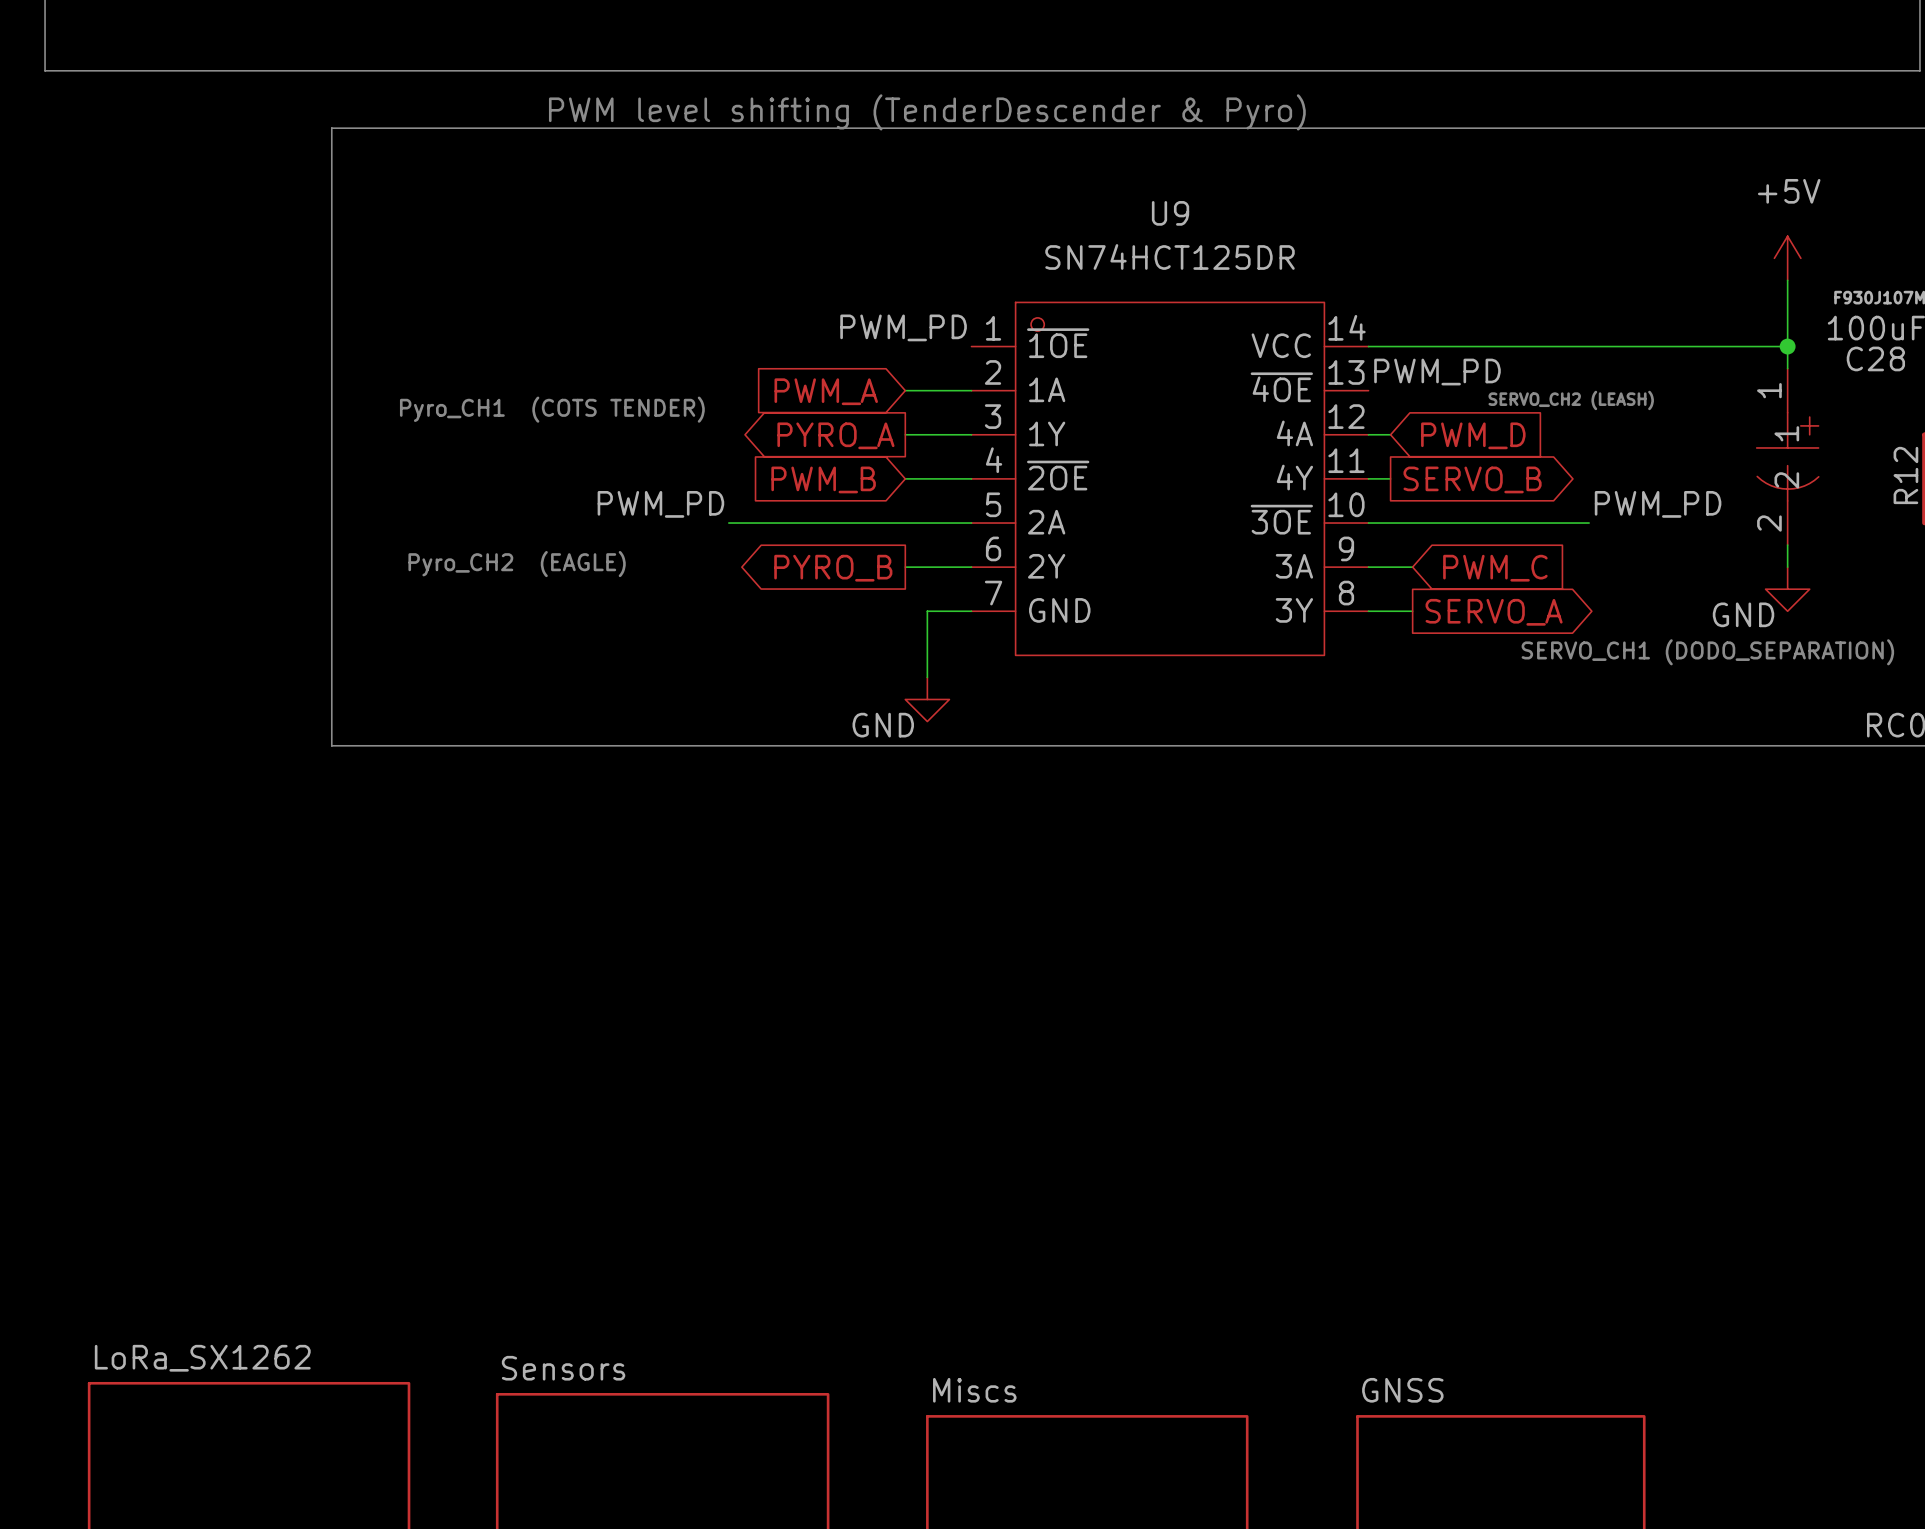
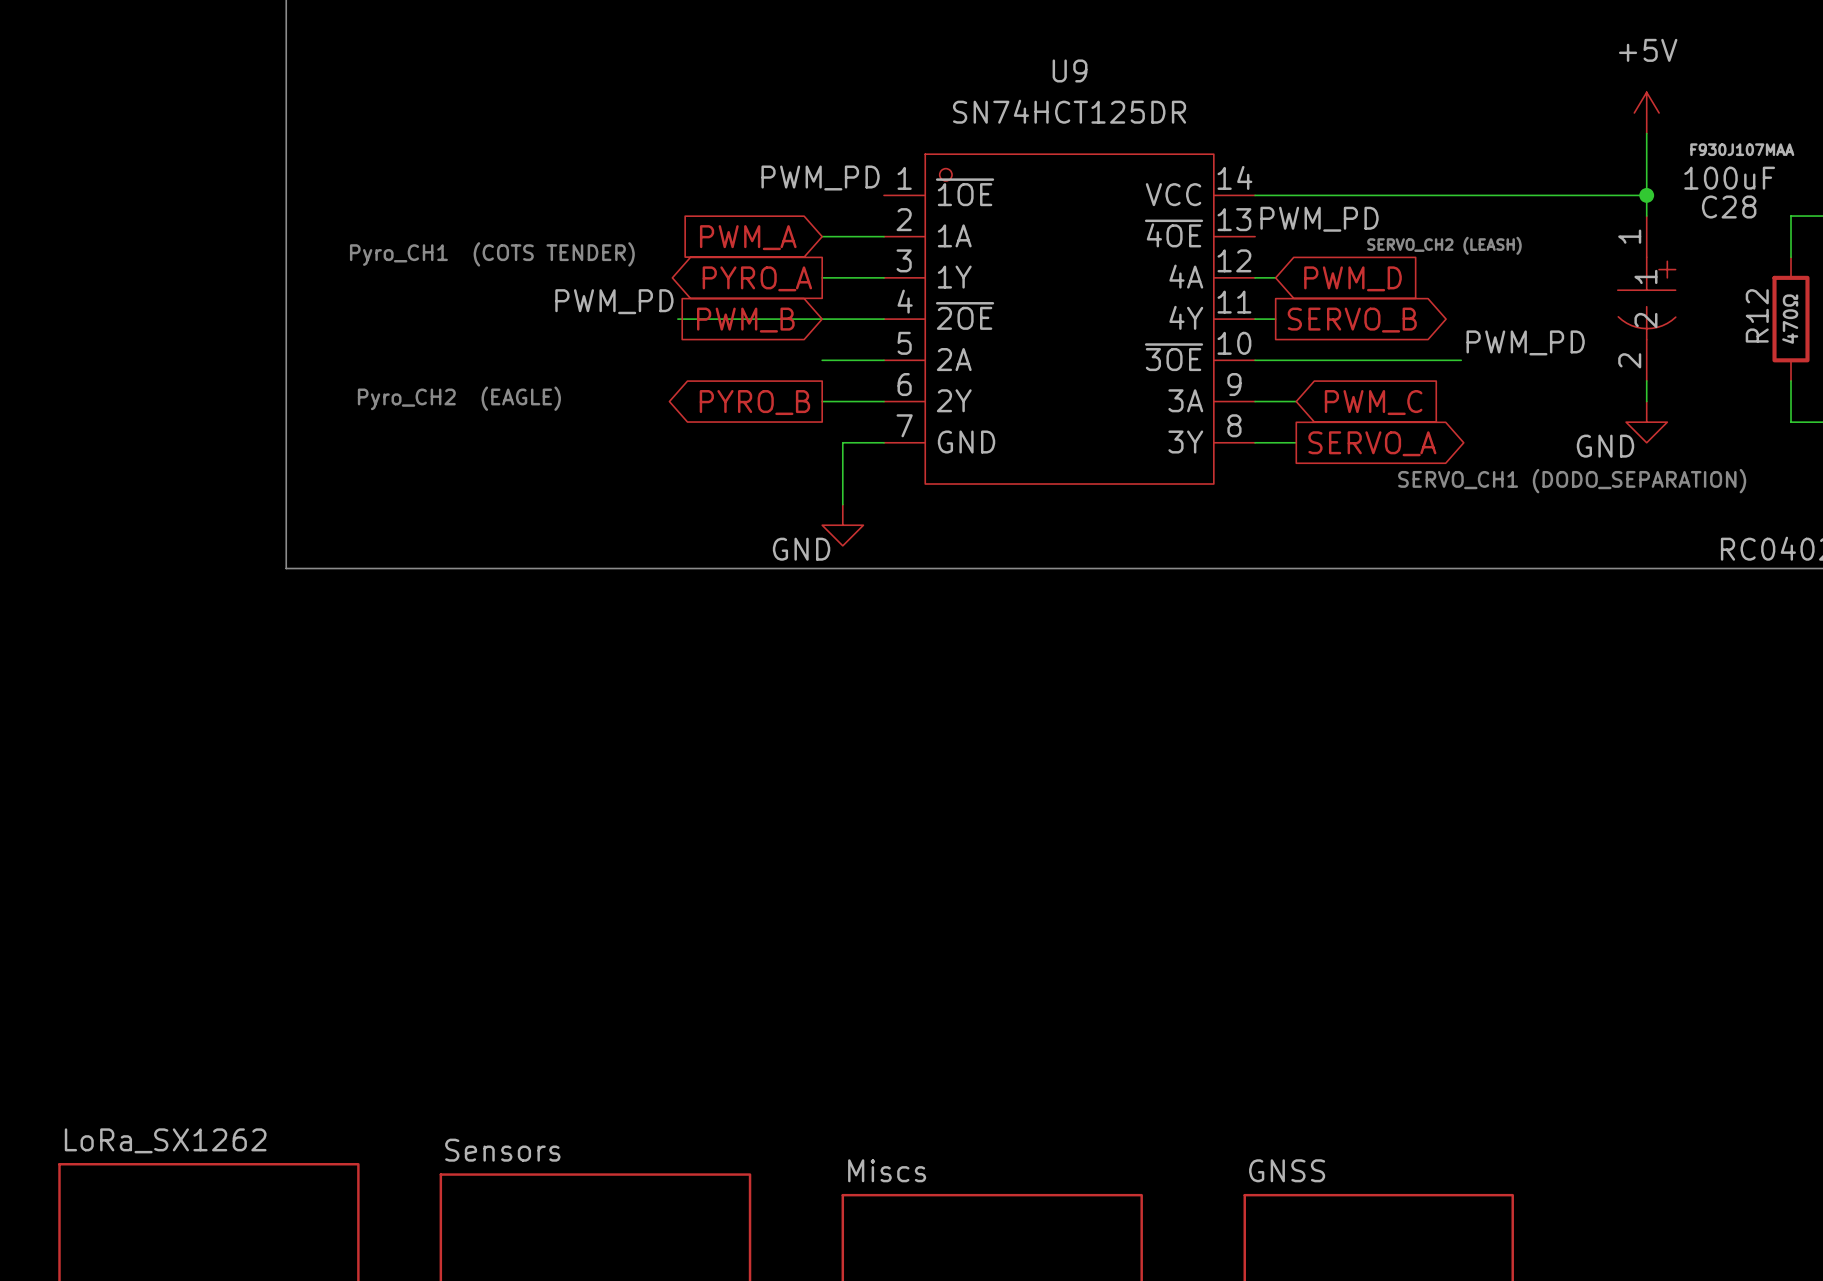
wire: none -> (677, 319) (822, 319)
label position: PWM_PD (660, 504) -> PWM_PD (614, 301)
wire: (728, 523) (905, 523) -> none

